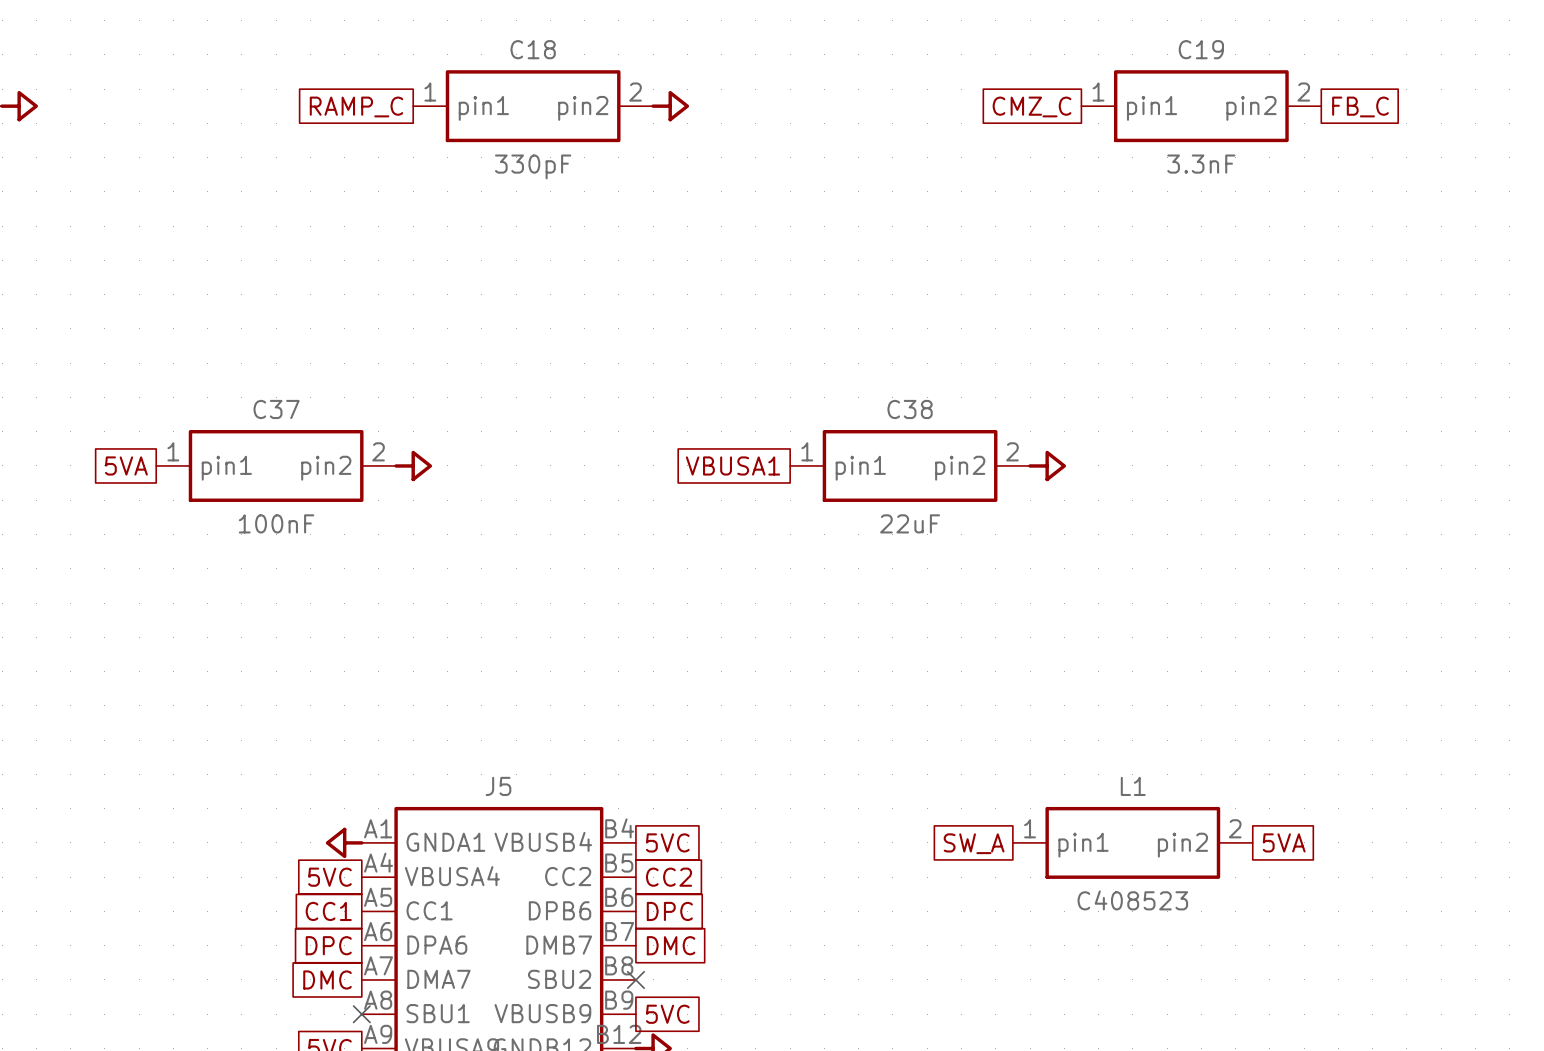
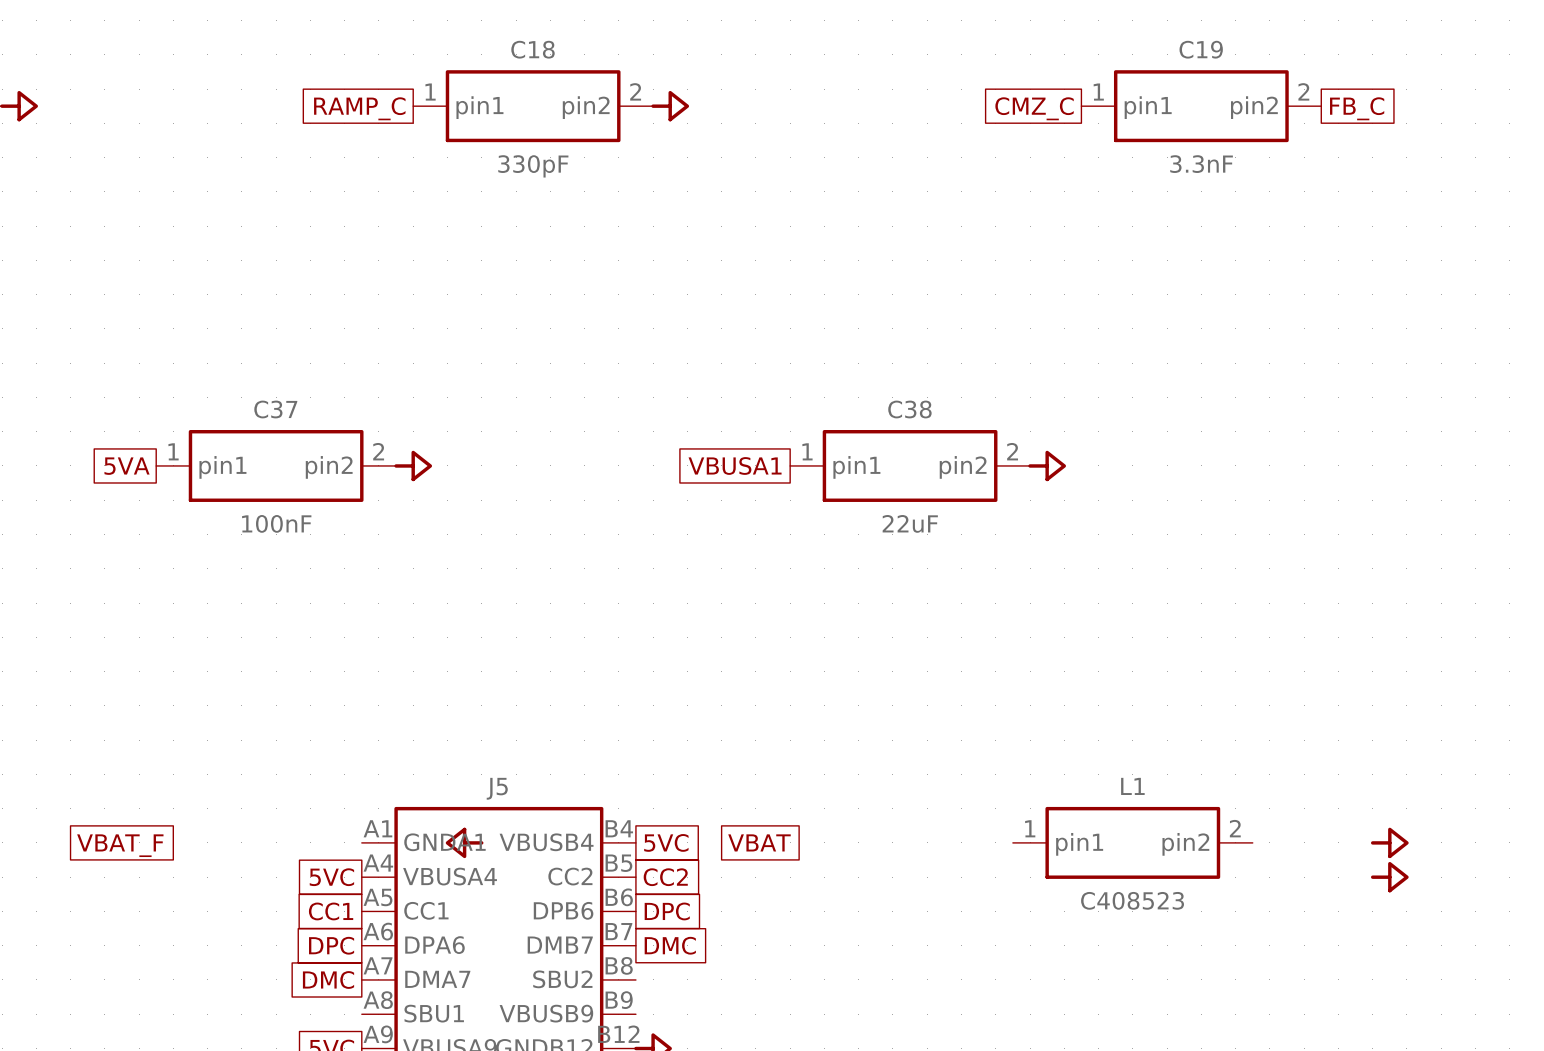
power symbol position: (344, 842) -> (464, 842)
global label: none -> VBAT (759, 842)
global label: 5VA (1284, 842) -> none
power symbol: none -> (1389, 842)
global label: none -> VBAT_F (120, 845)
global label: SW_A (974, 843) -> none
power symbol: none -> (1389, 877)
no-connect mark: (635, 979) -> none
no-connect mark: (361, 1014) -> none
global label: 5VC (667, 1014) -> none

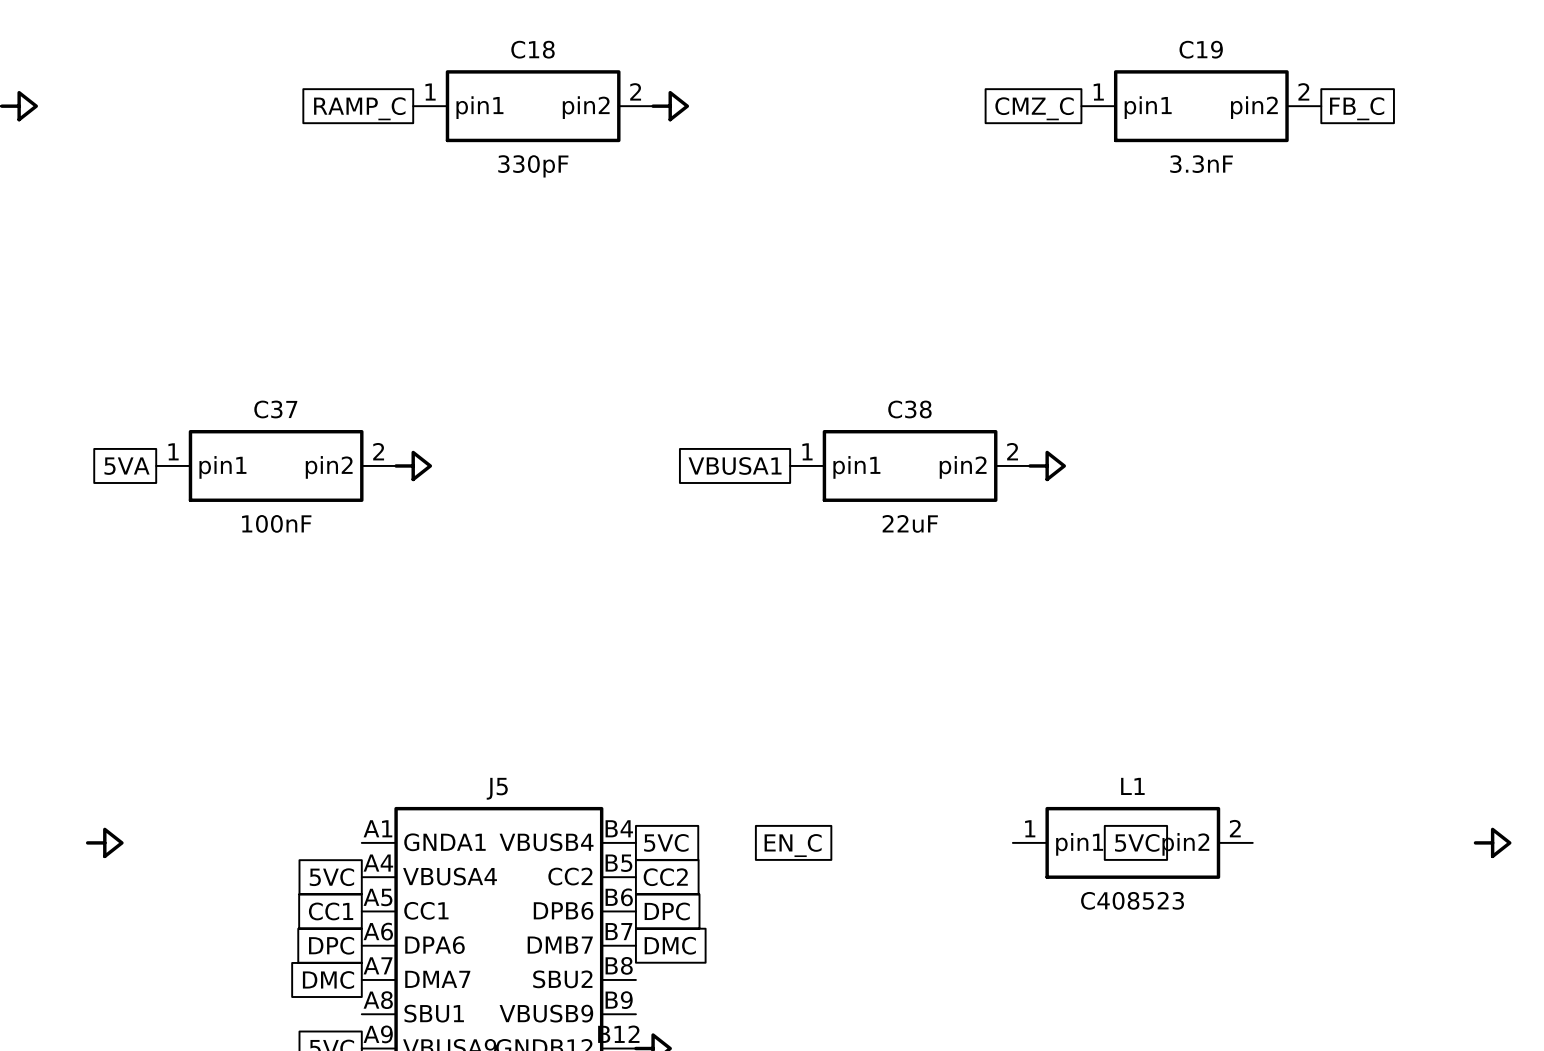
power symbol: none -> (104, 842)
power symbol: (464, 842) -> none
global label: VBAT (759, 842) -> none
global label: none -> 5VC (1137, 842)
power symbol: (1389, 842) -> none
power symbol: none -> (1492, 842)
global label: VBAT_F (120, 845) -> none
global label: none -> EN_C (793, 845)
power symbol: (1389, 877) -> none

